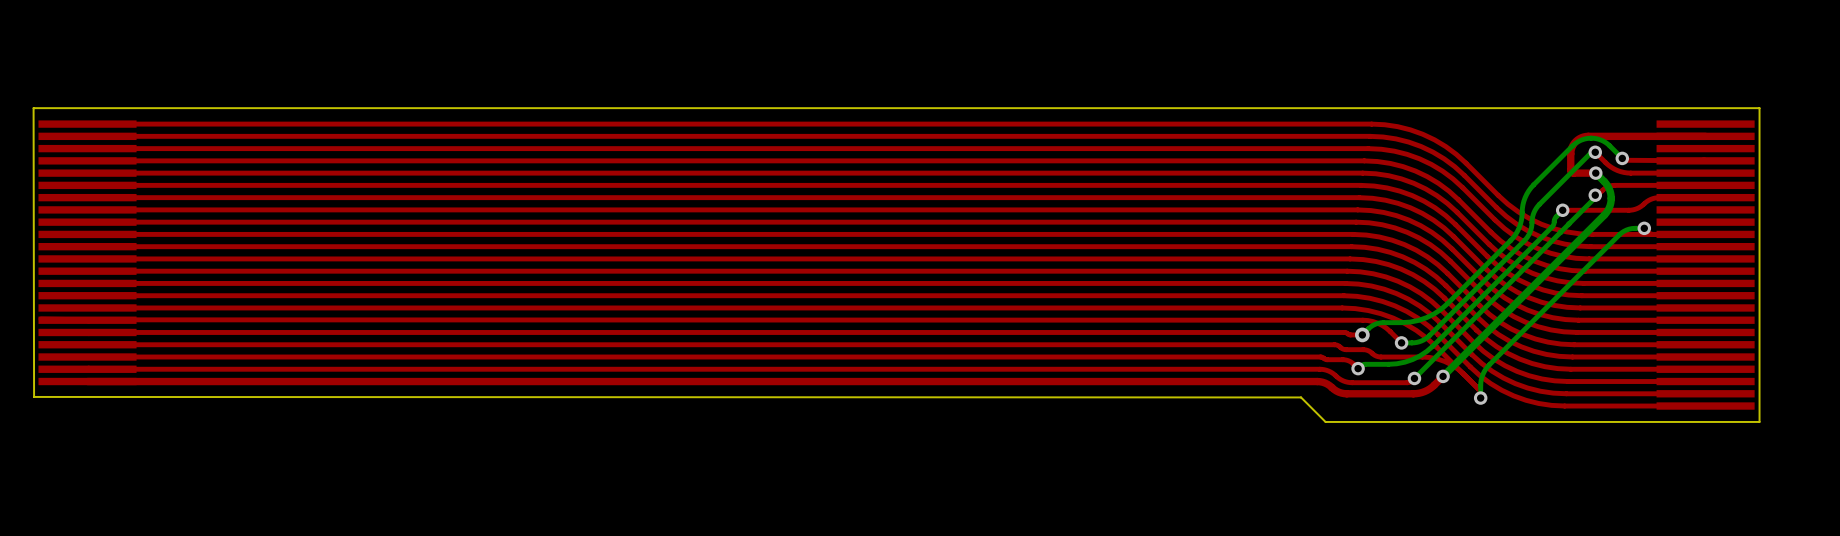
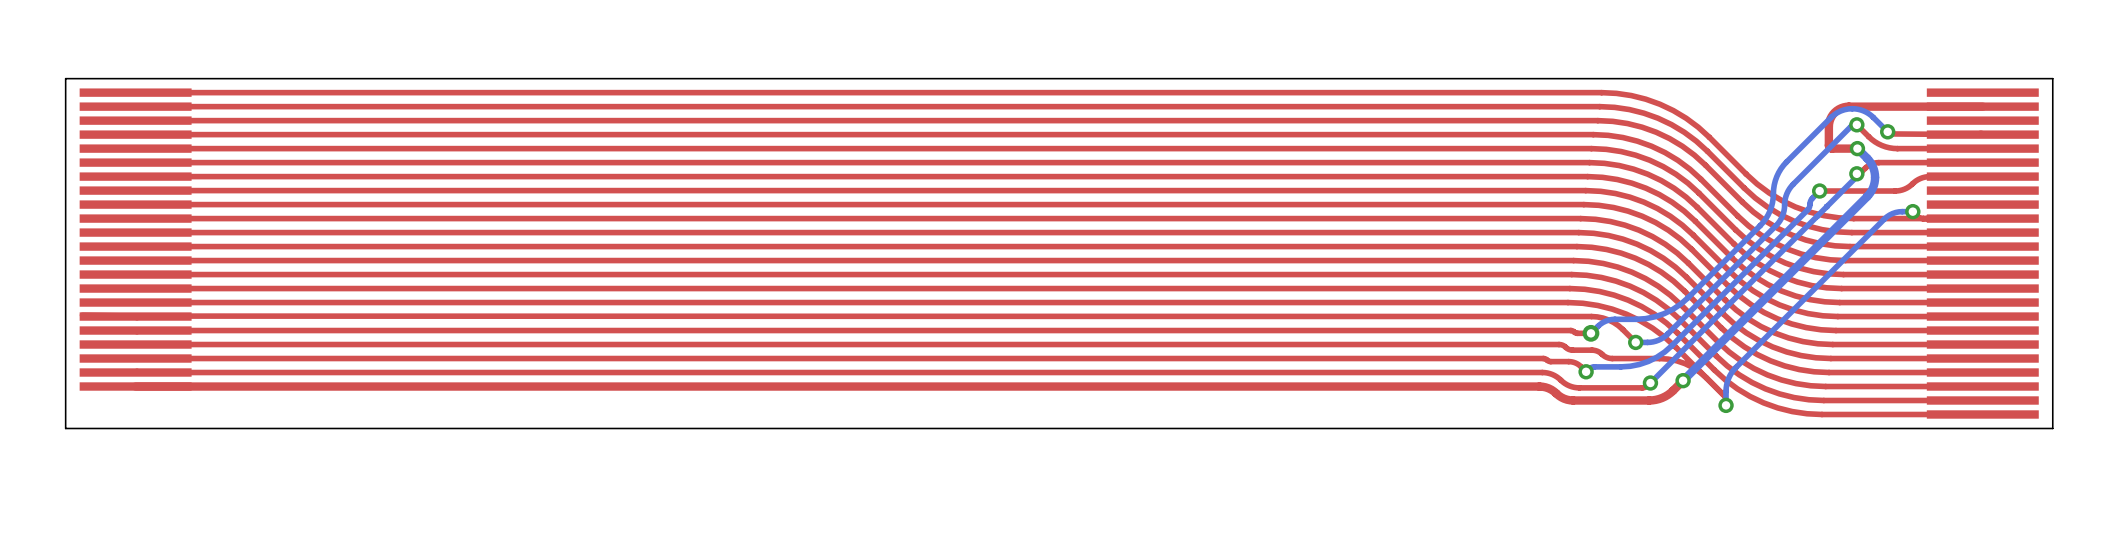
board edge: (1759, 108) (33, 108) (34, 396) (1301, 397) (1325, 421) (1759, 421) (1759, 108) -> (2052, 78) (2052, 428) (65, 428) (65, 78) (2052, 78)

